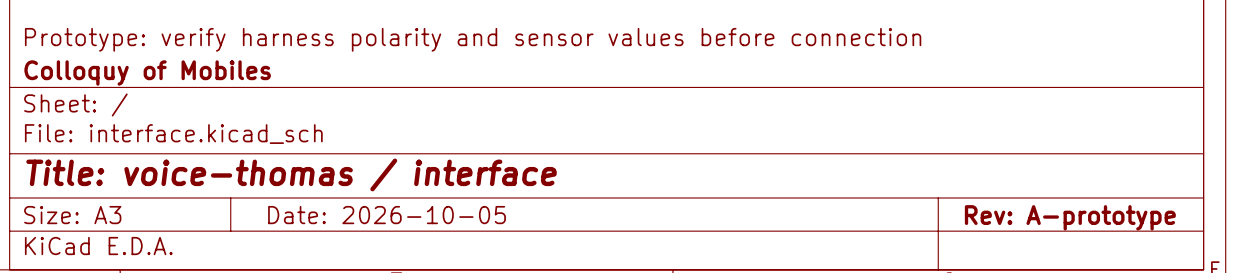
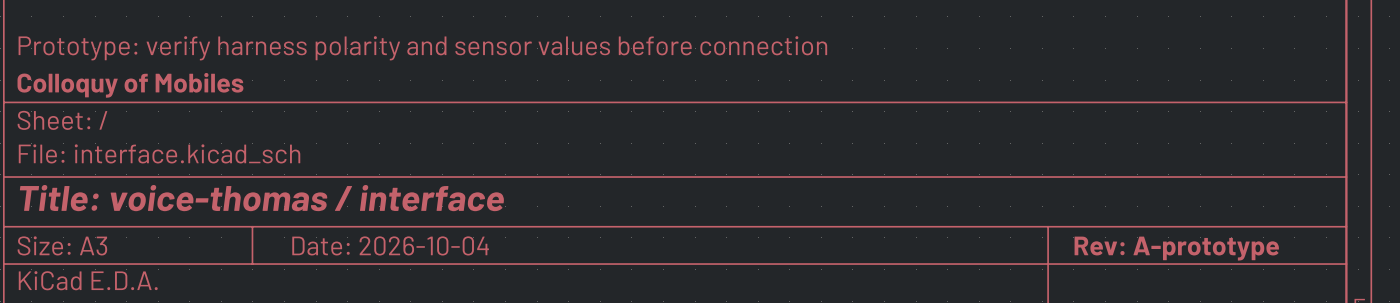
title block: Date: 2026-10-05 (387, 215) -> Date: 2026-10-04 (390, 245)

